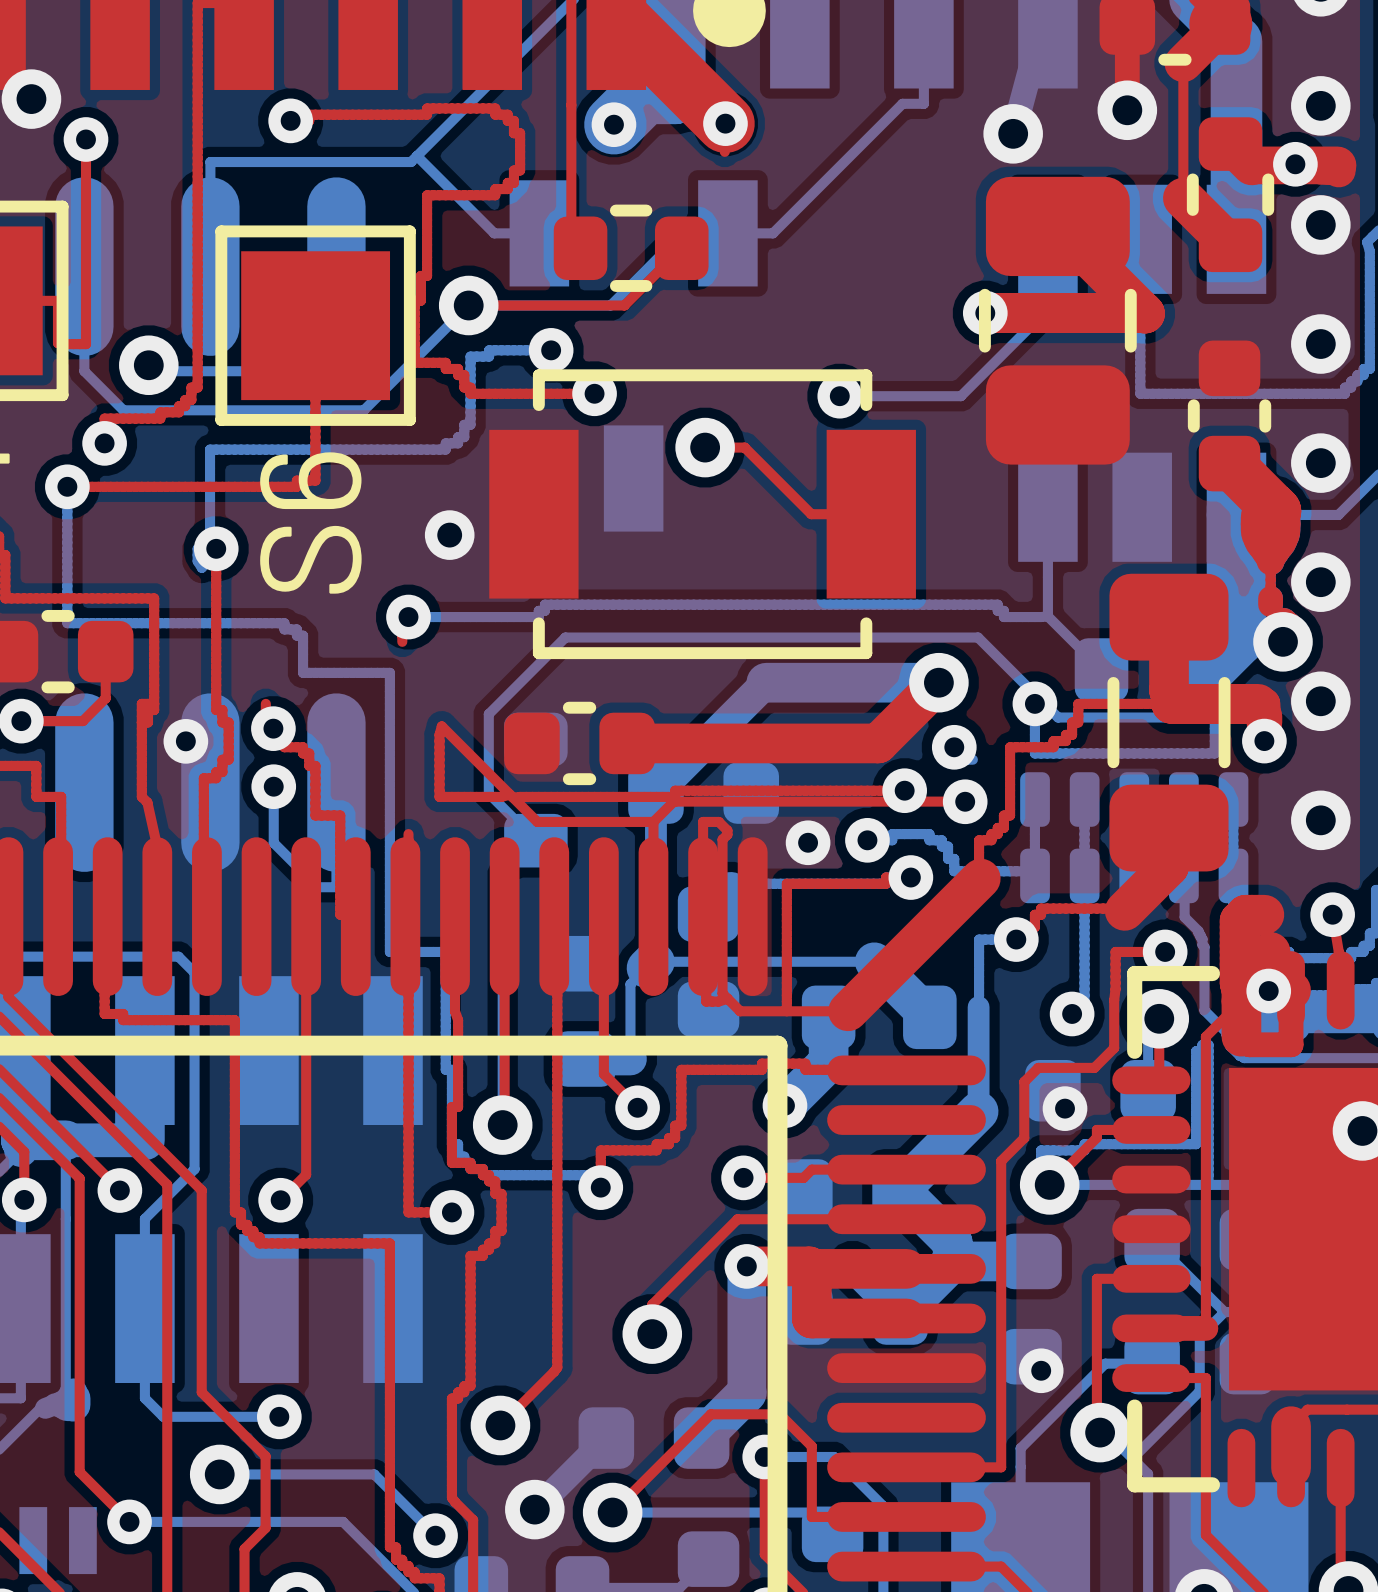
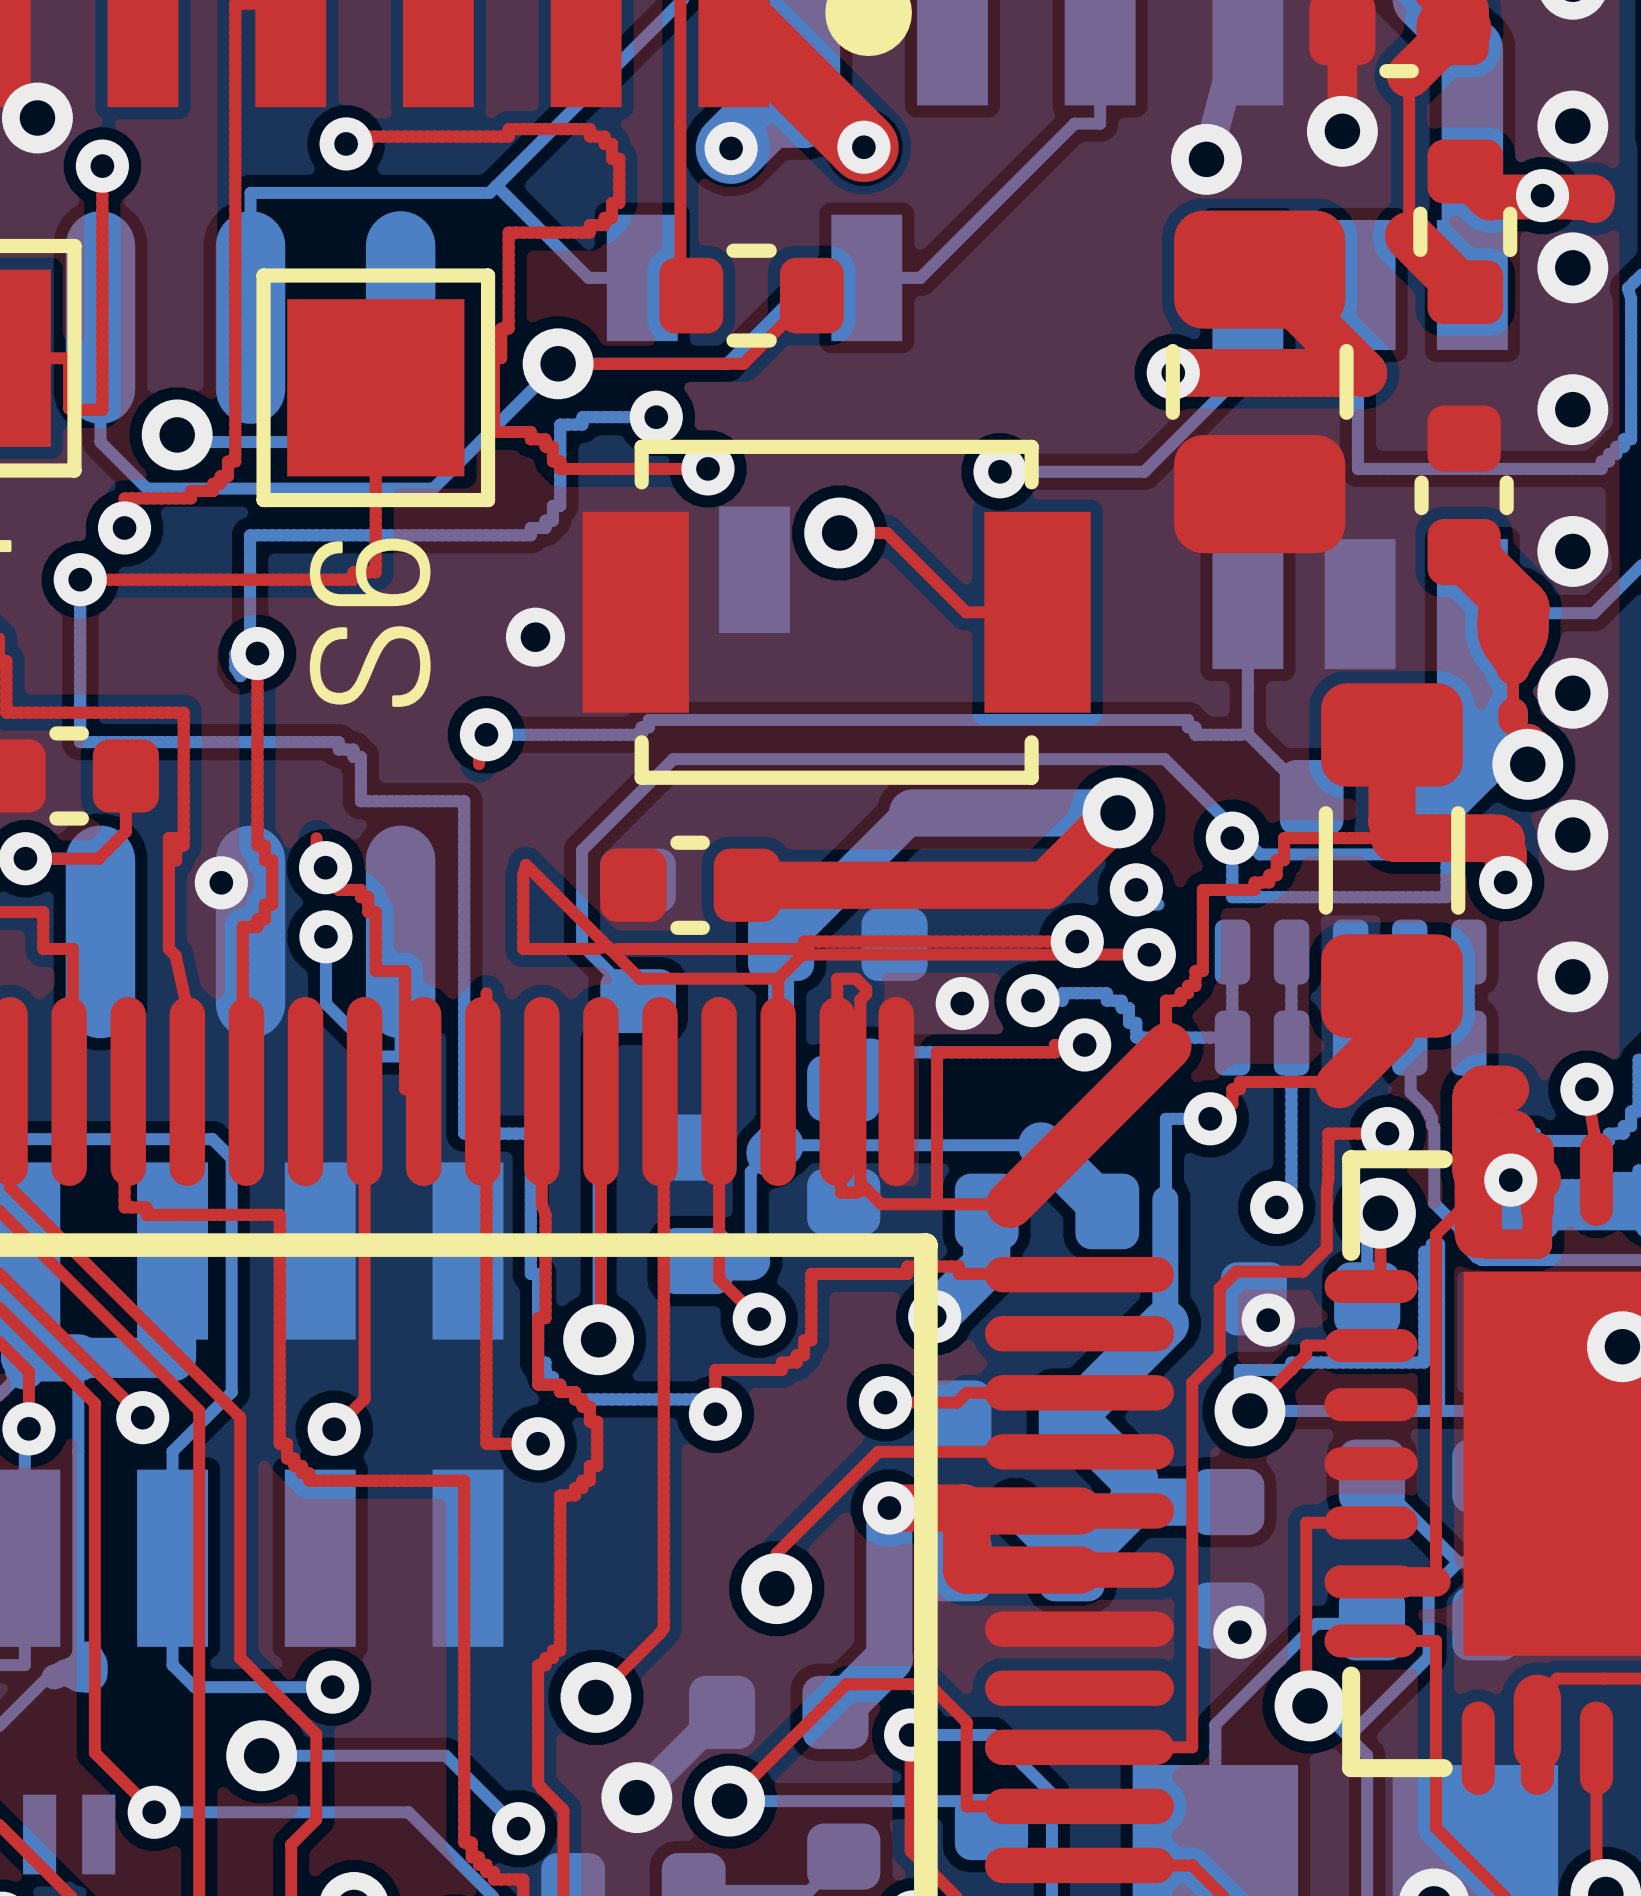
top track: (724, 145) (724, 151) -> none

